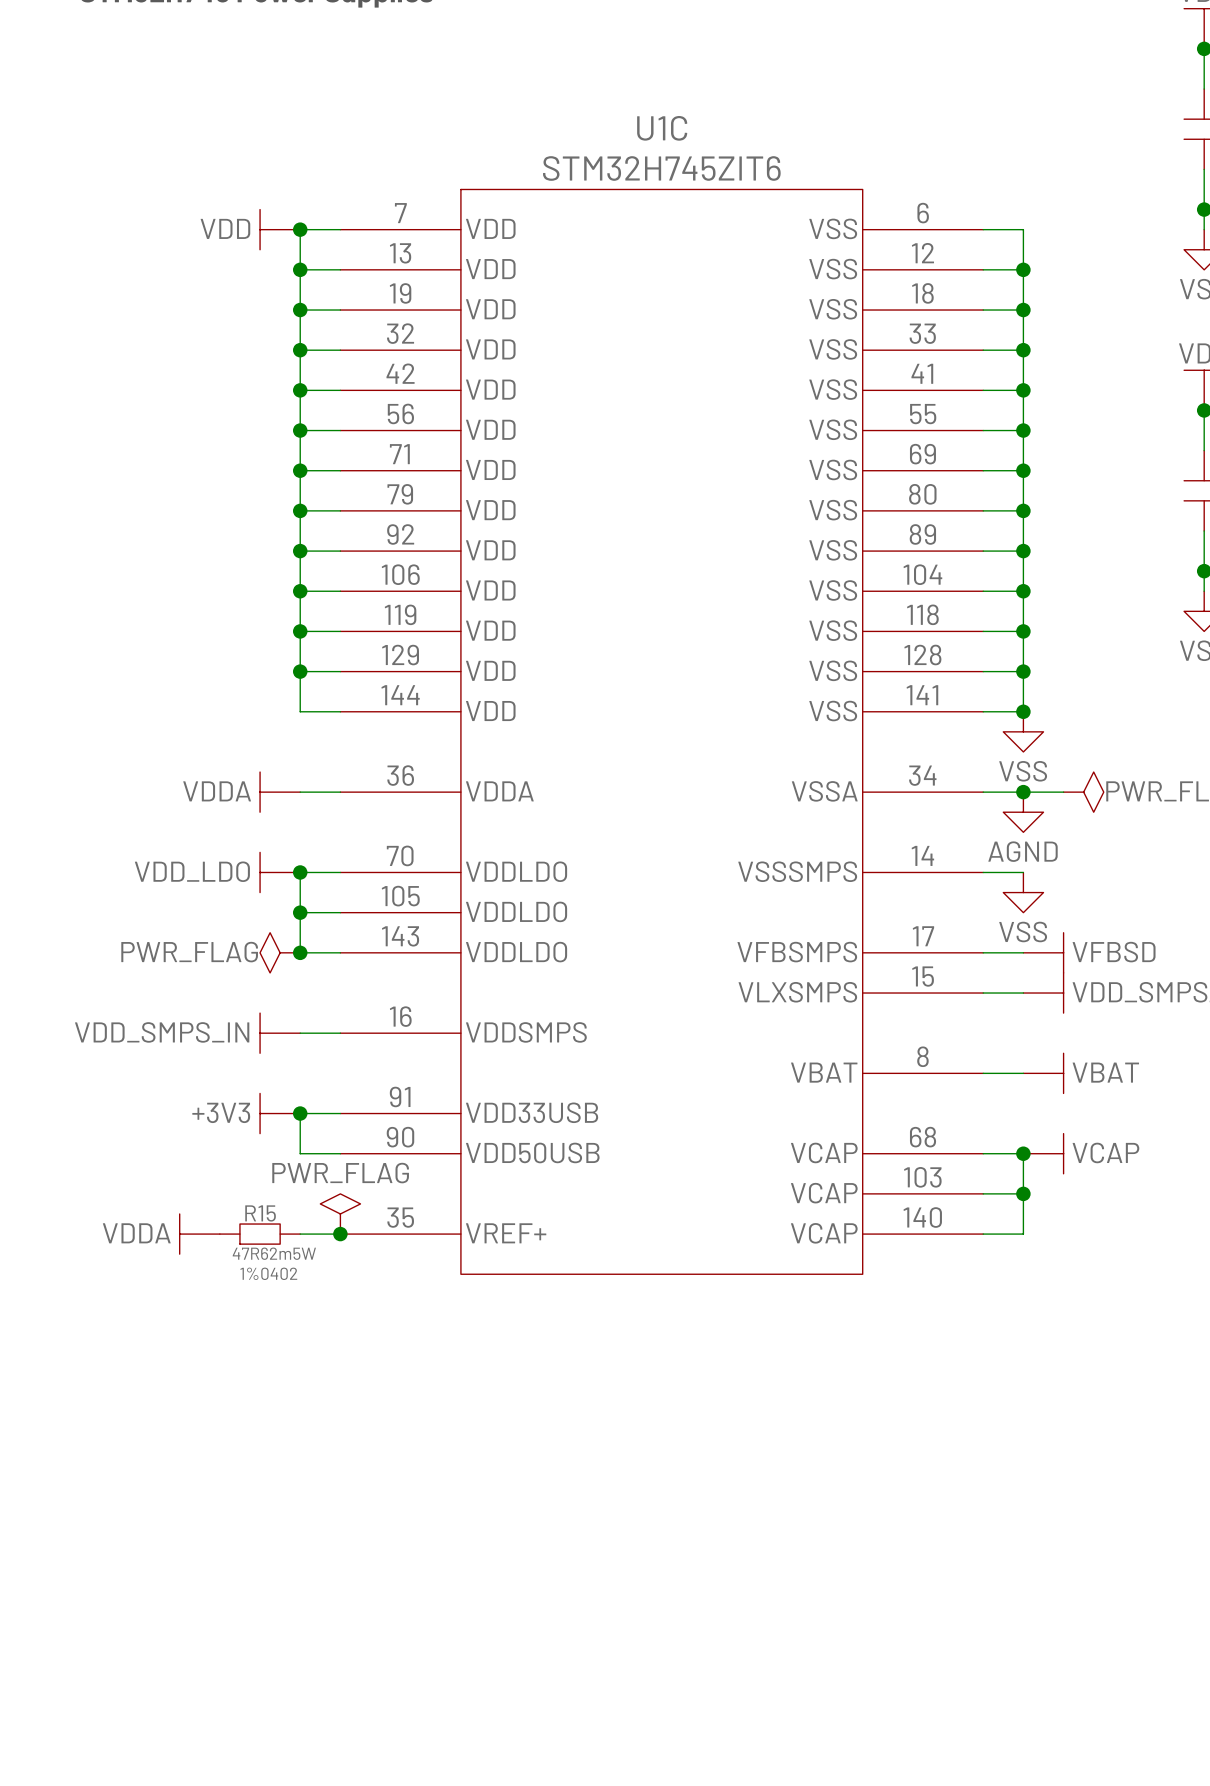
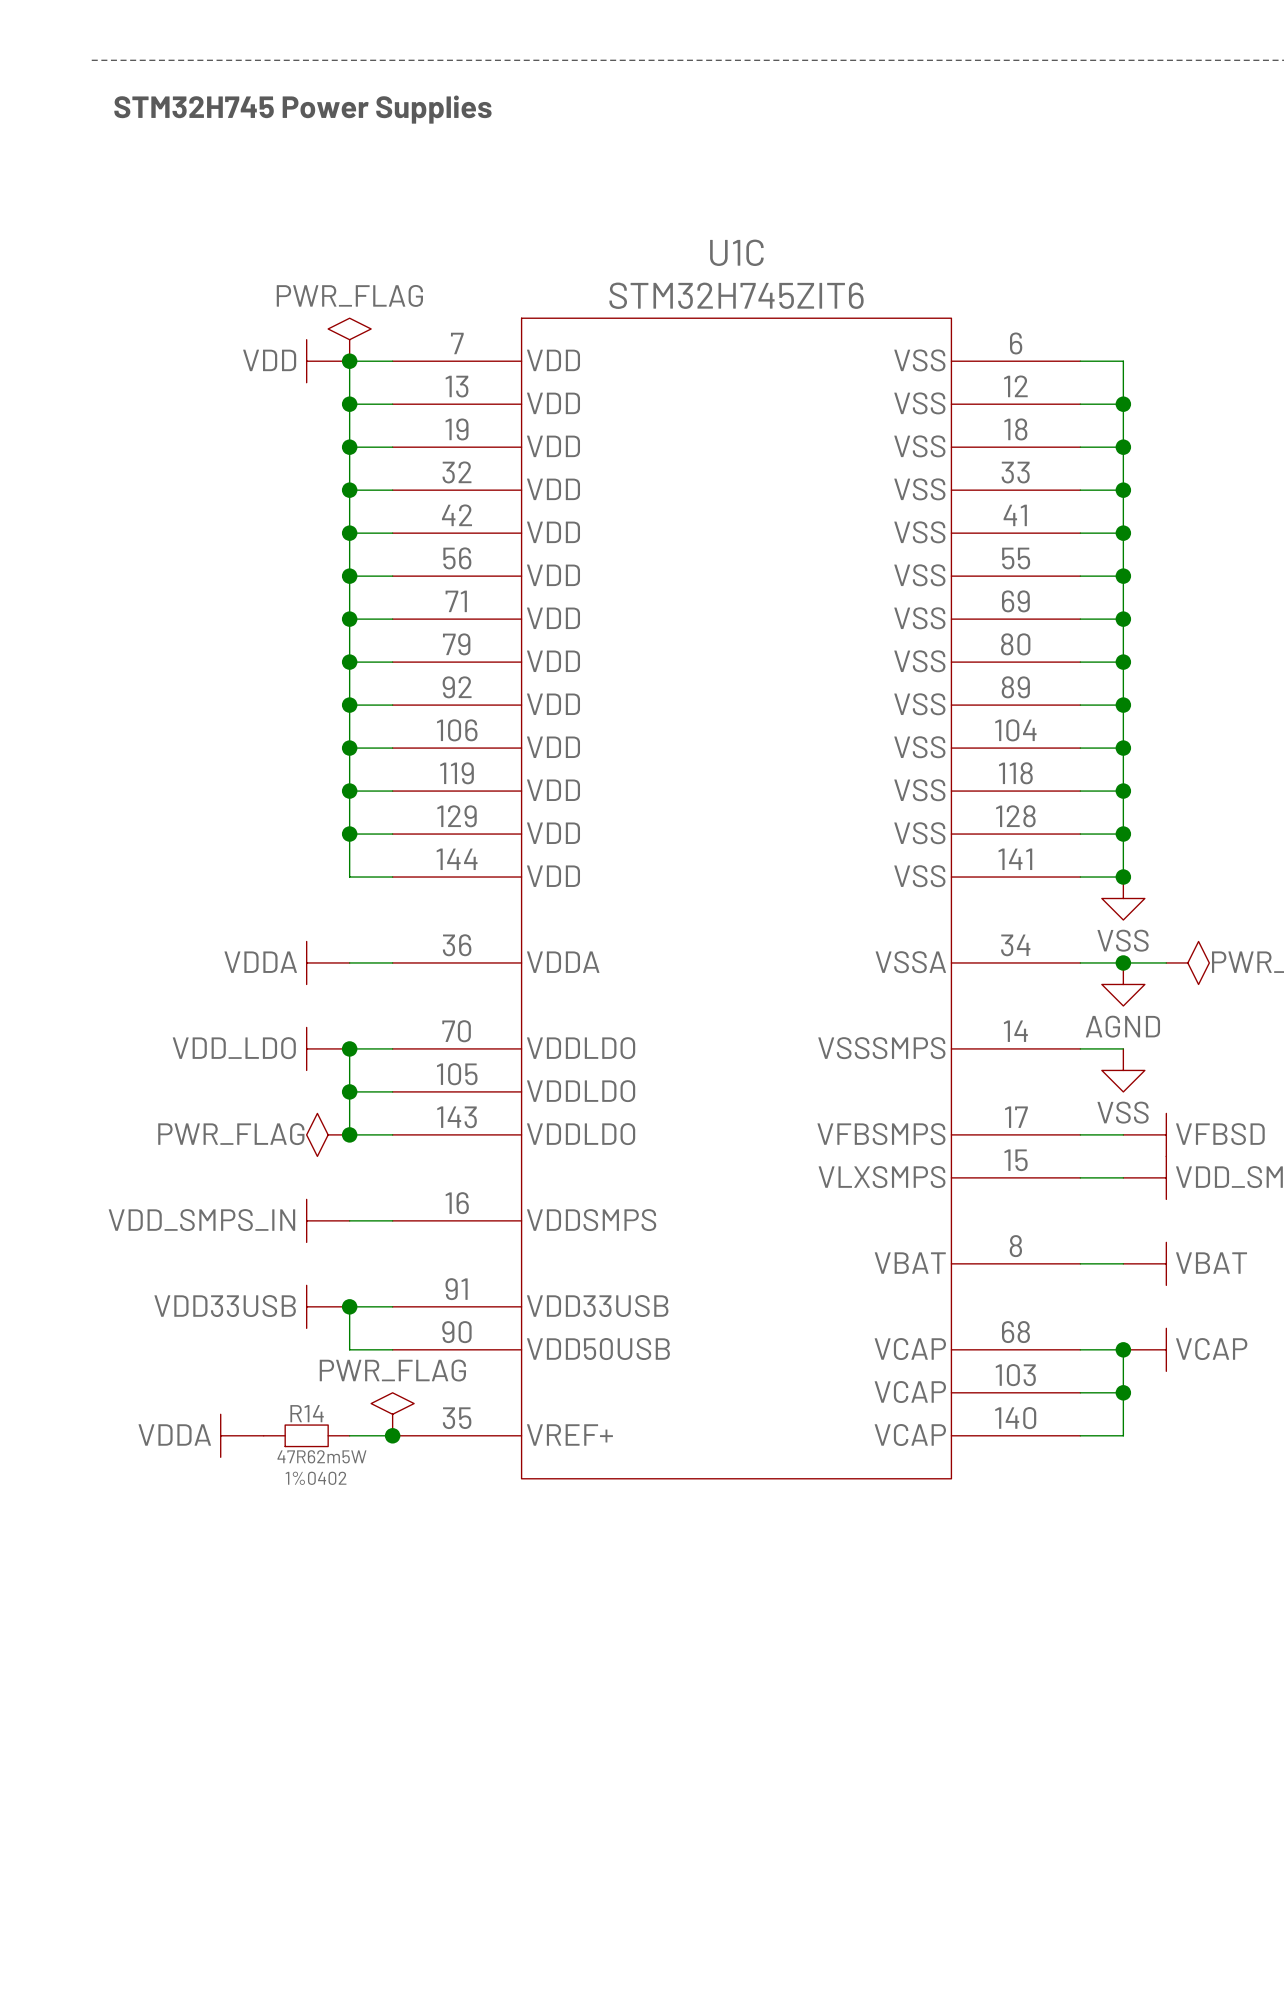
power symbol: none -> PWR_FLAG (349, 339)
power symbol: +3V3 (280, 1113) -> VDD33USB (328, 1306)
R15 name: R15 (260, 1213) -> R14 (307, 1413)

